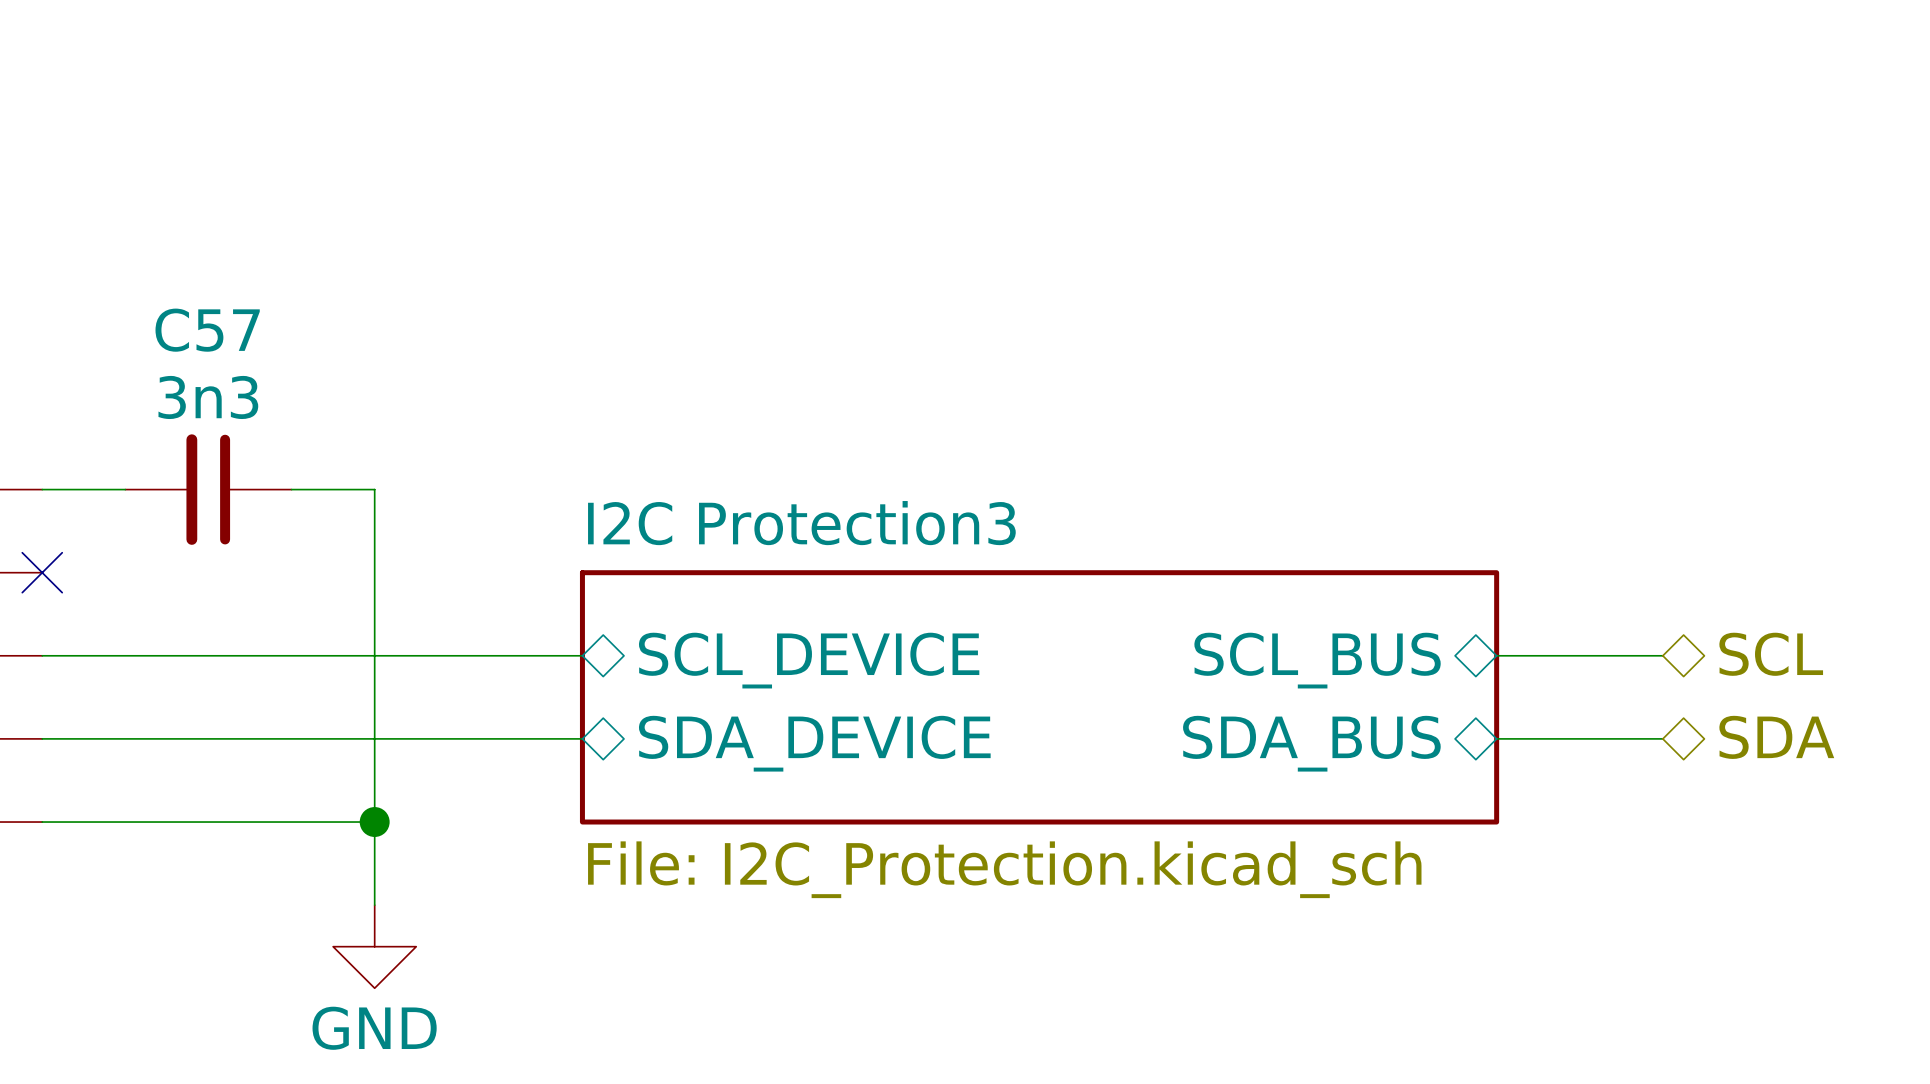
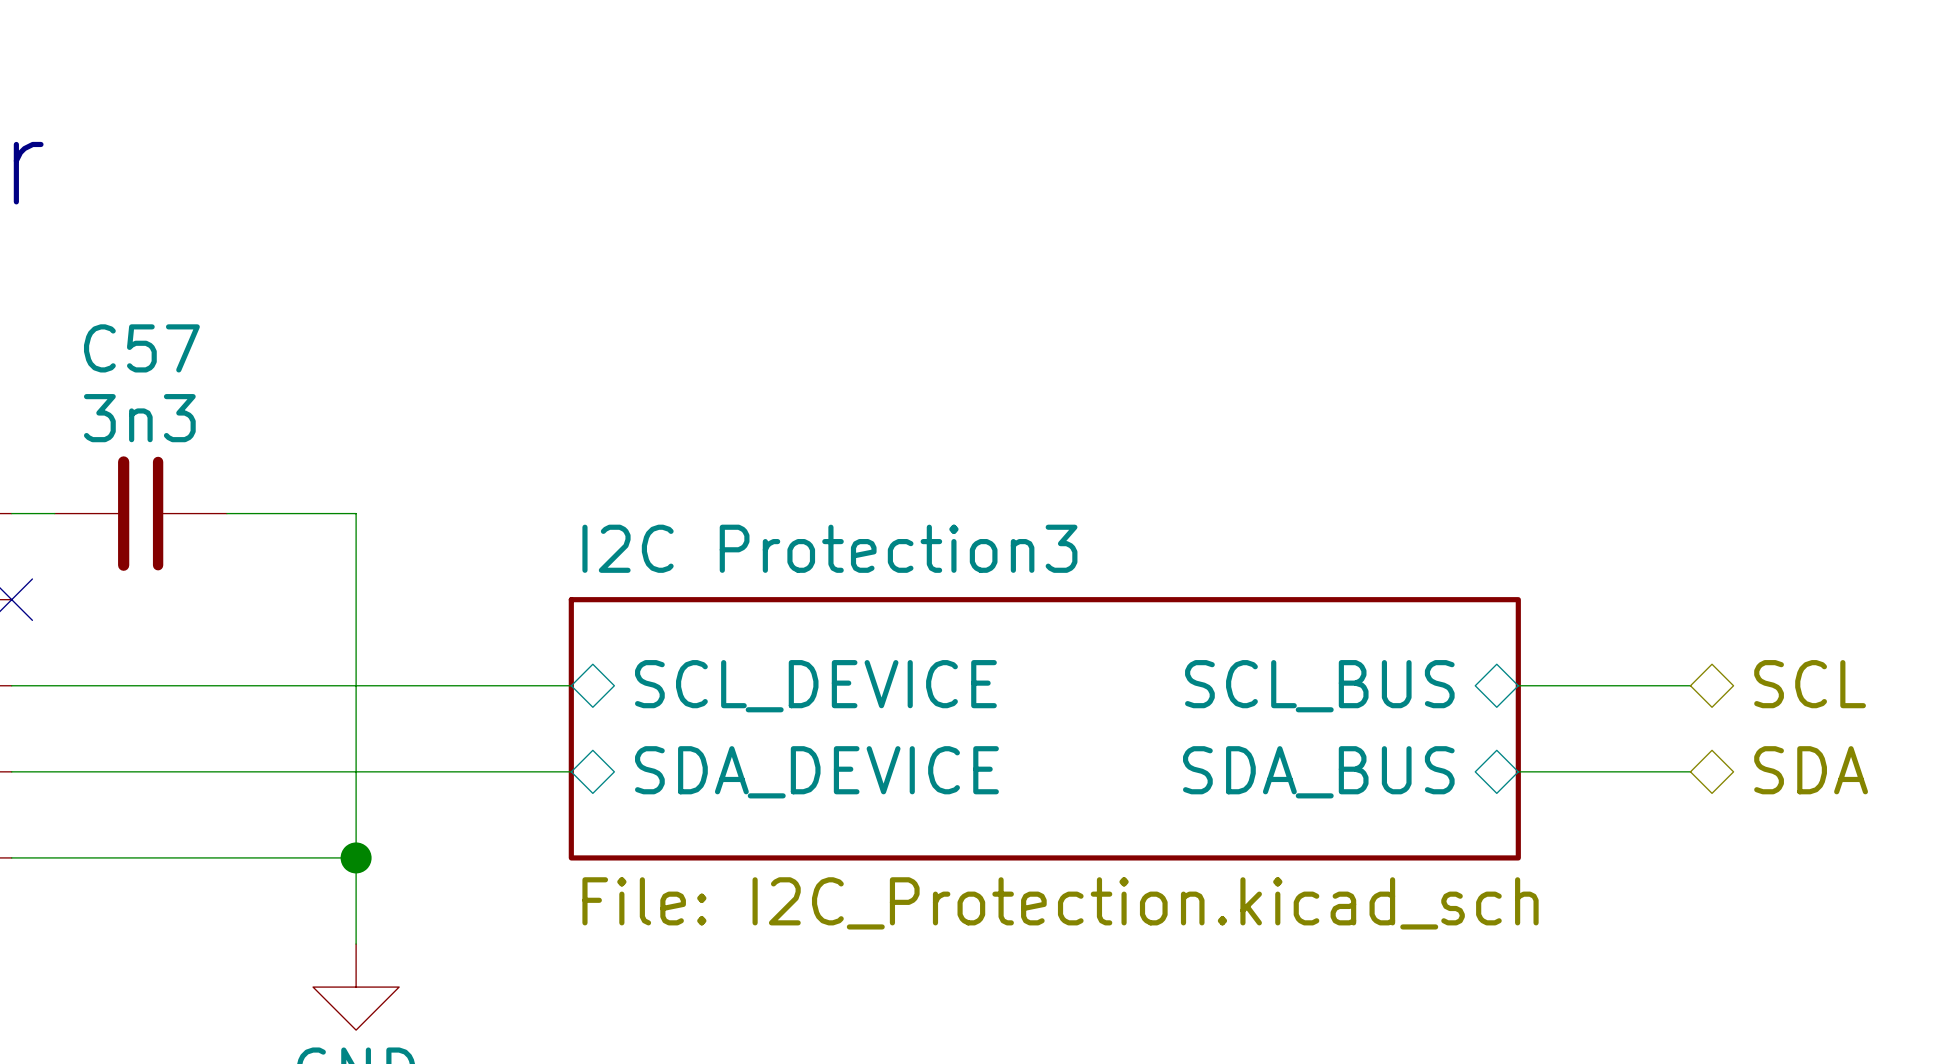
C57 position: (208, 489) -> (140, 513)

